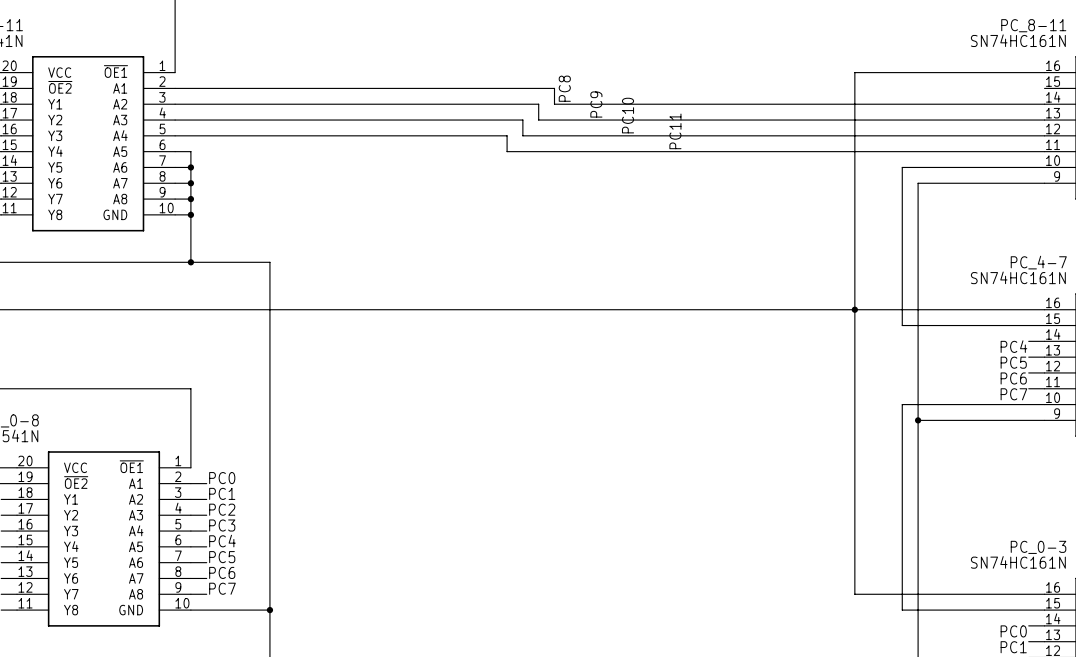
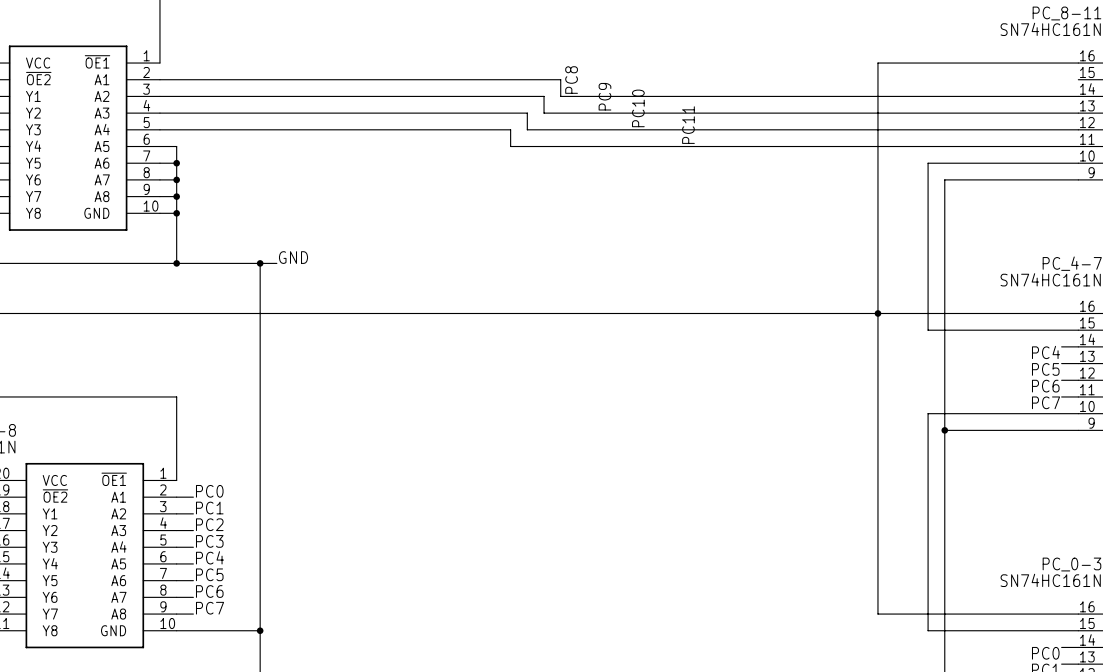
label: none -> GND (293, 257)
wire: none -> (260, 263) (276, 263)
junction: none -> (260, 263)

